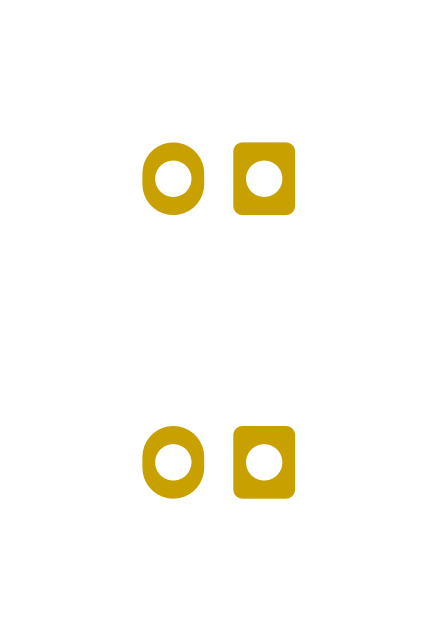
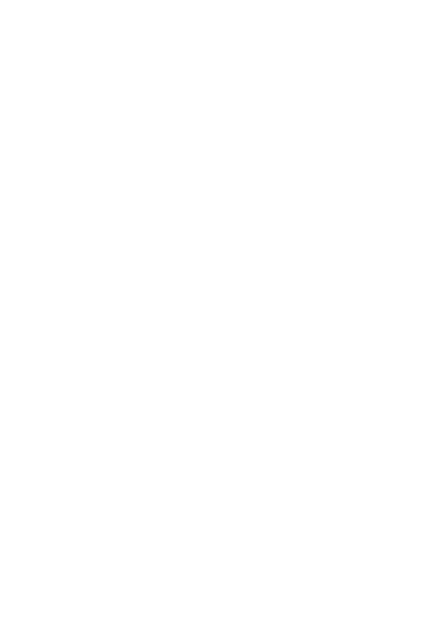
part: (218, 178) -> none
part: (218, 462) -> none

